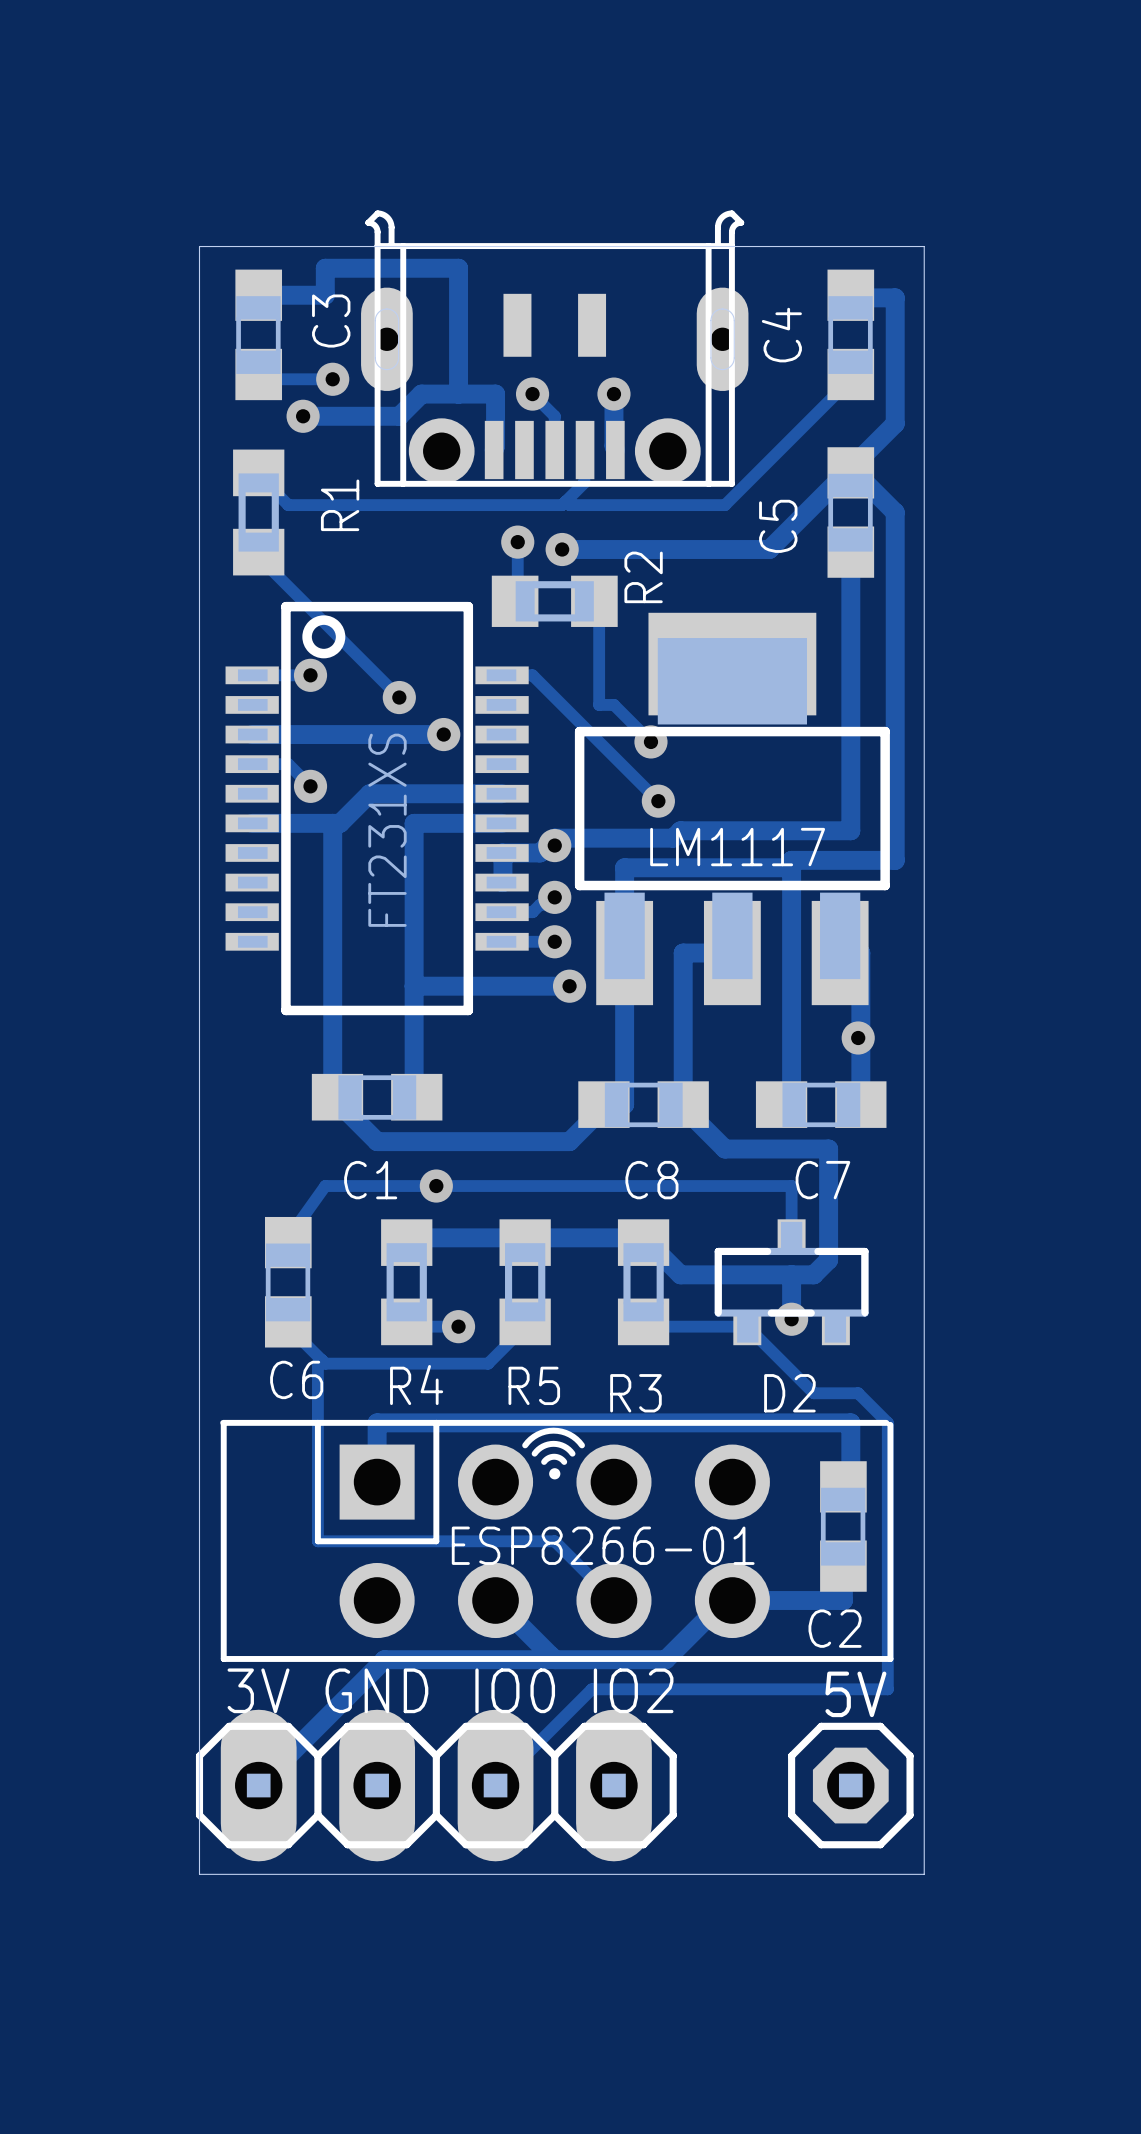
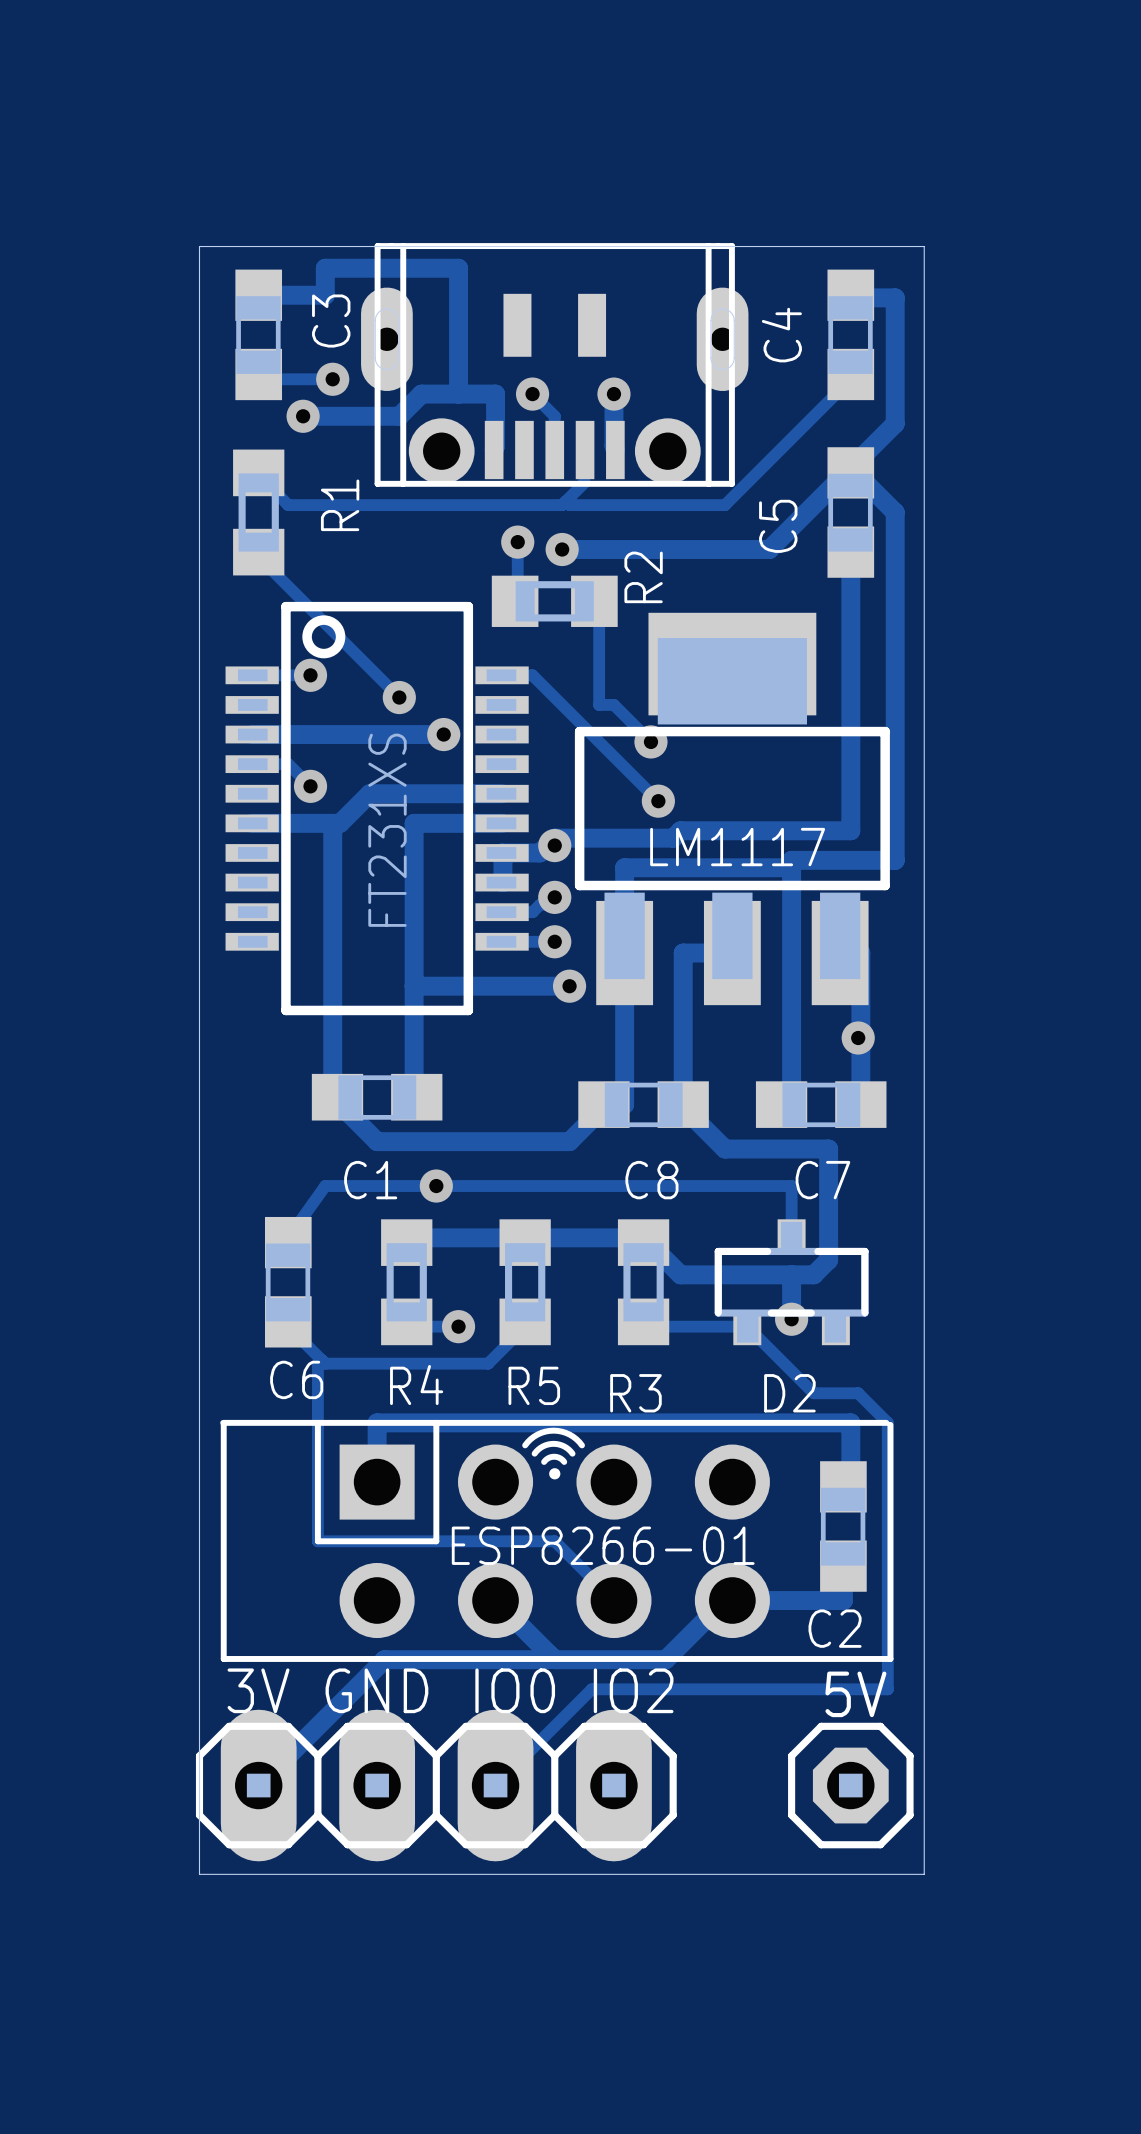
part footprint: [361, 210, 749, 487] -> [361, 243, 749, 487]

